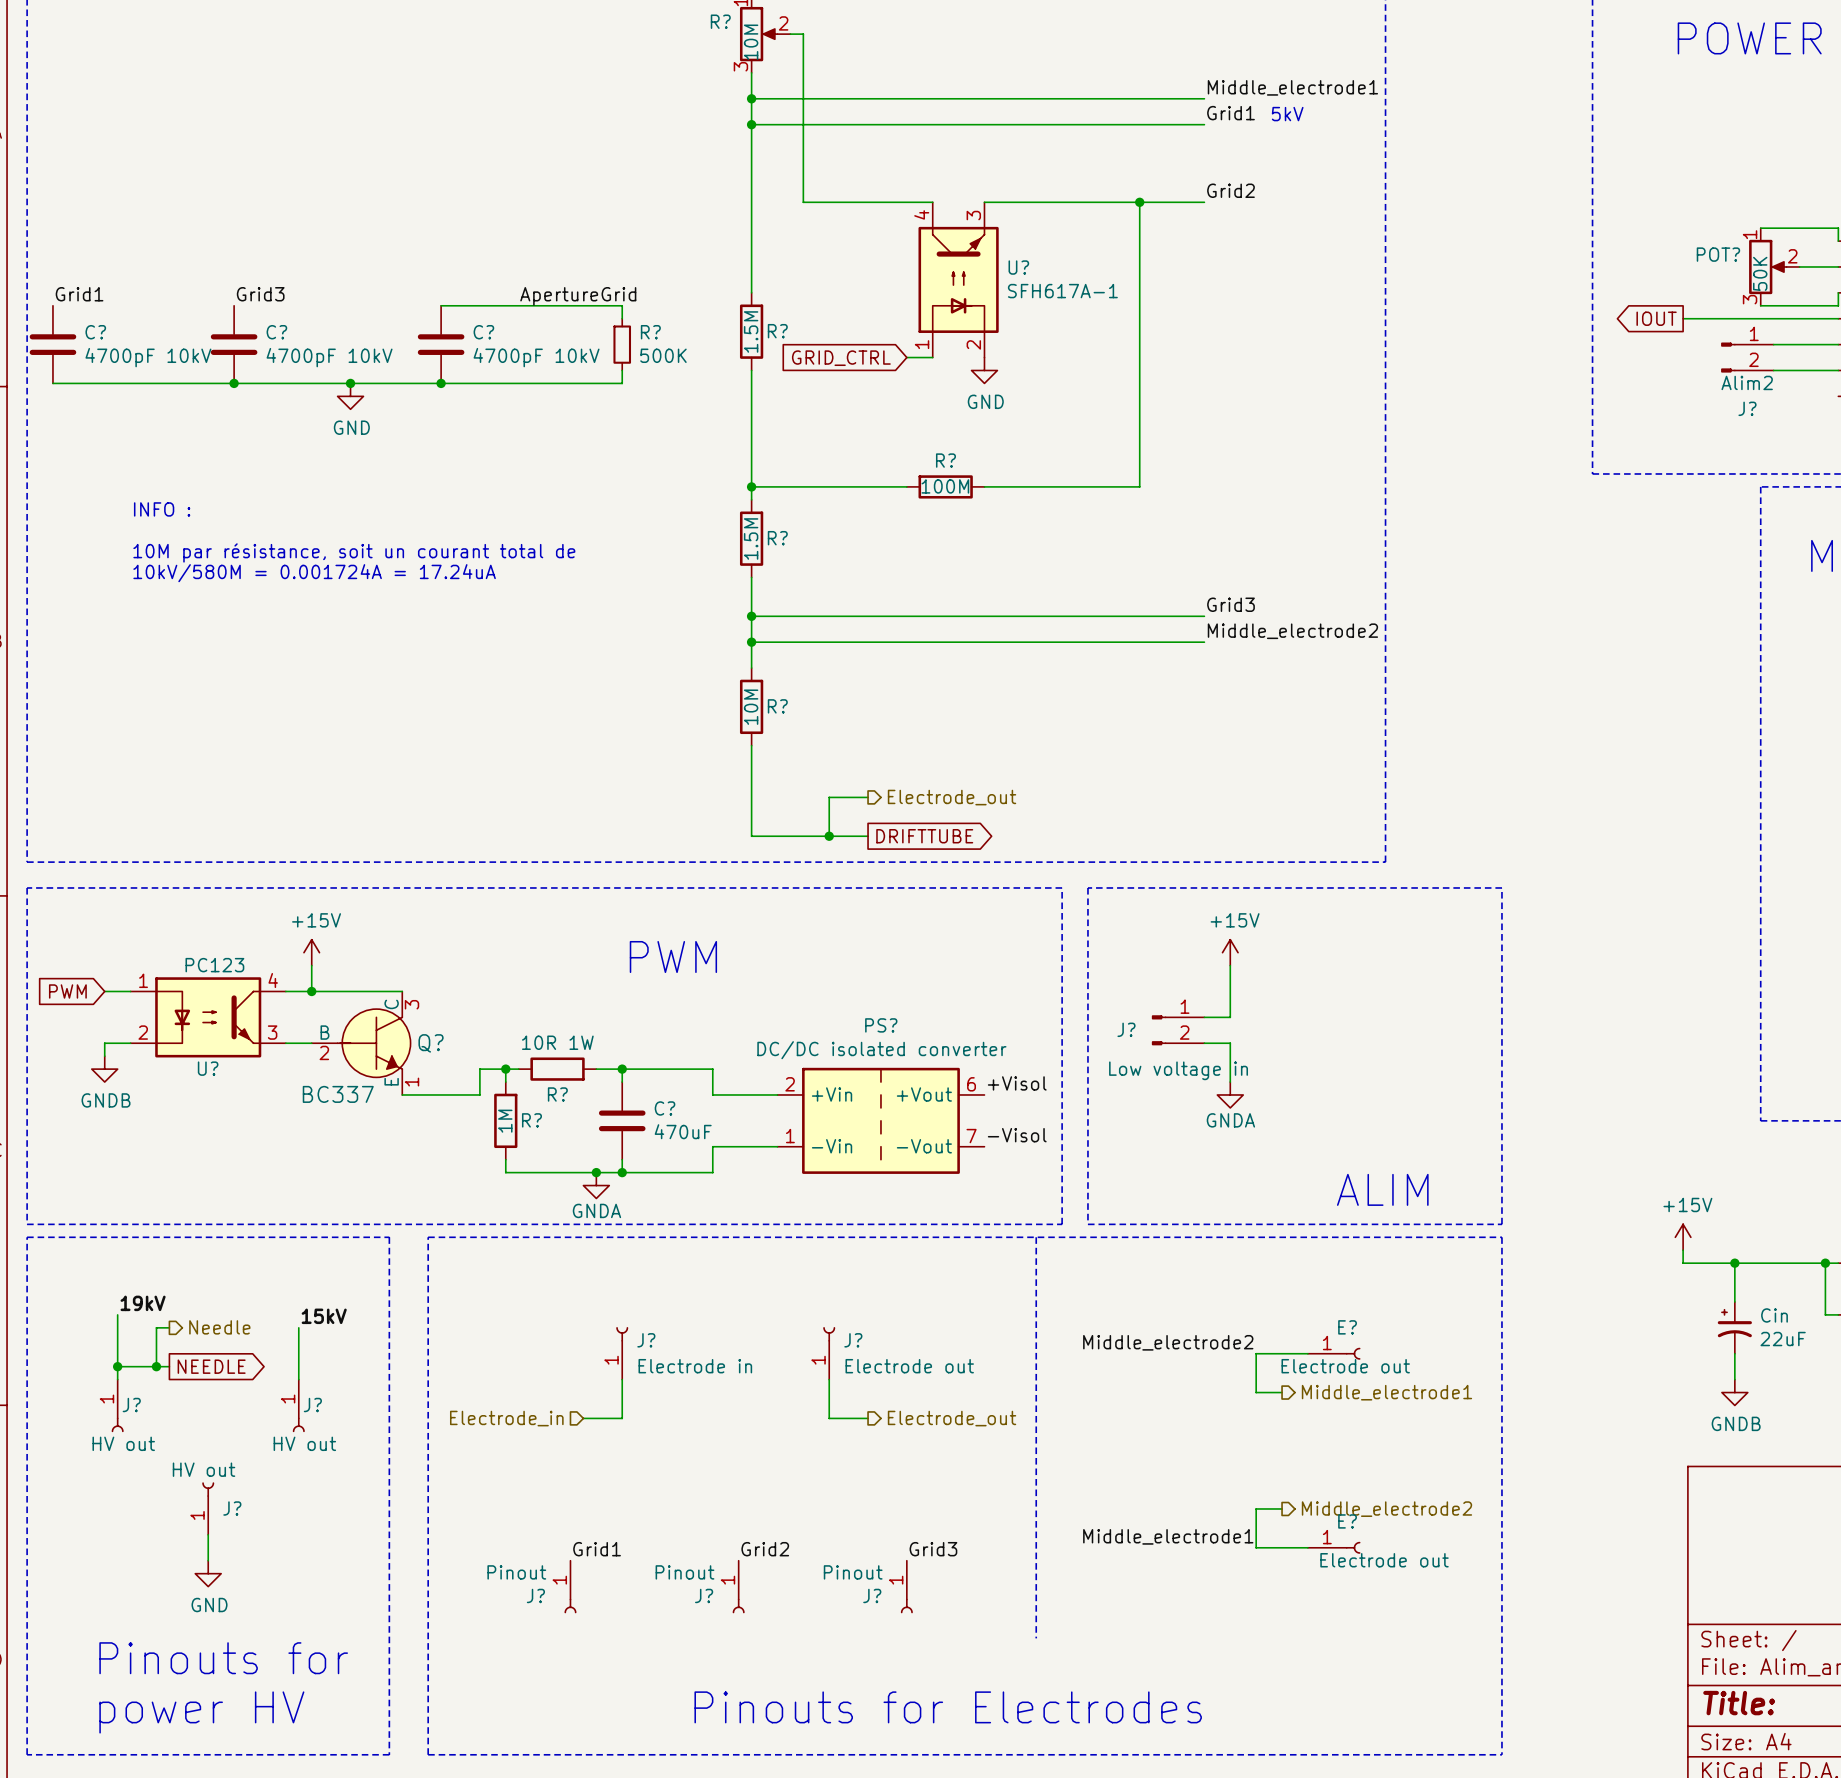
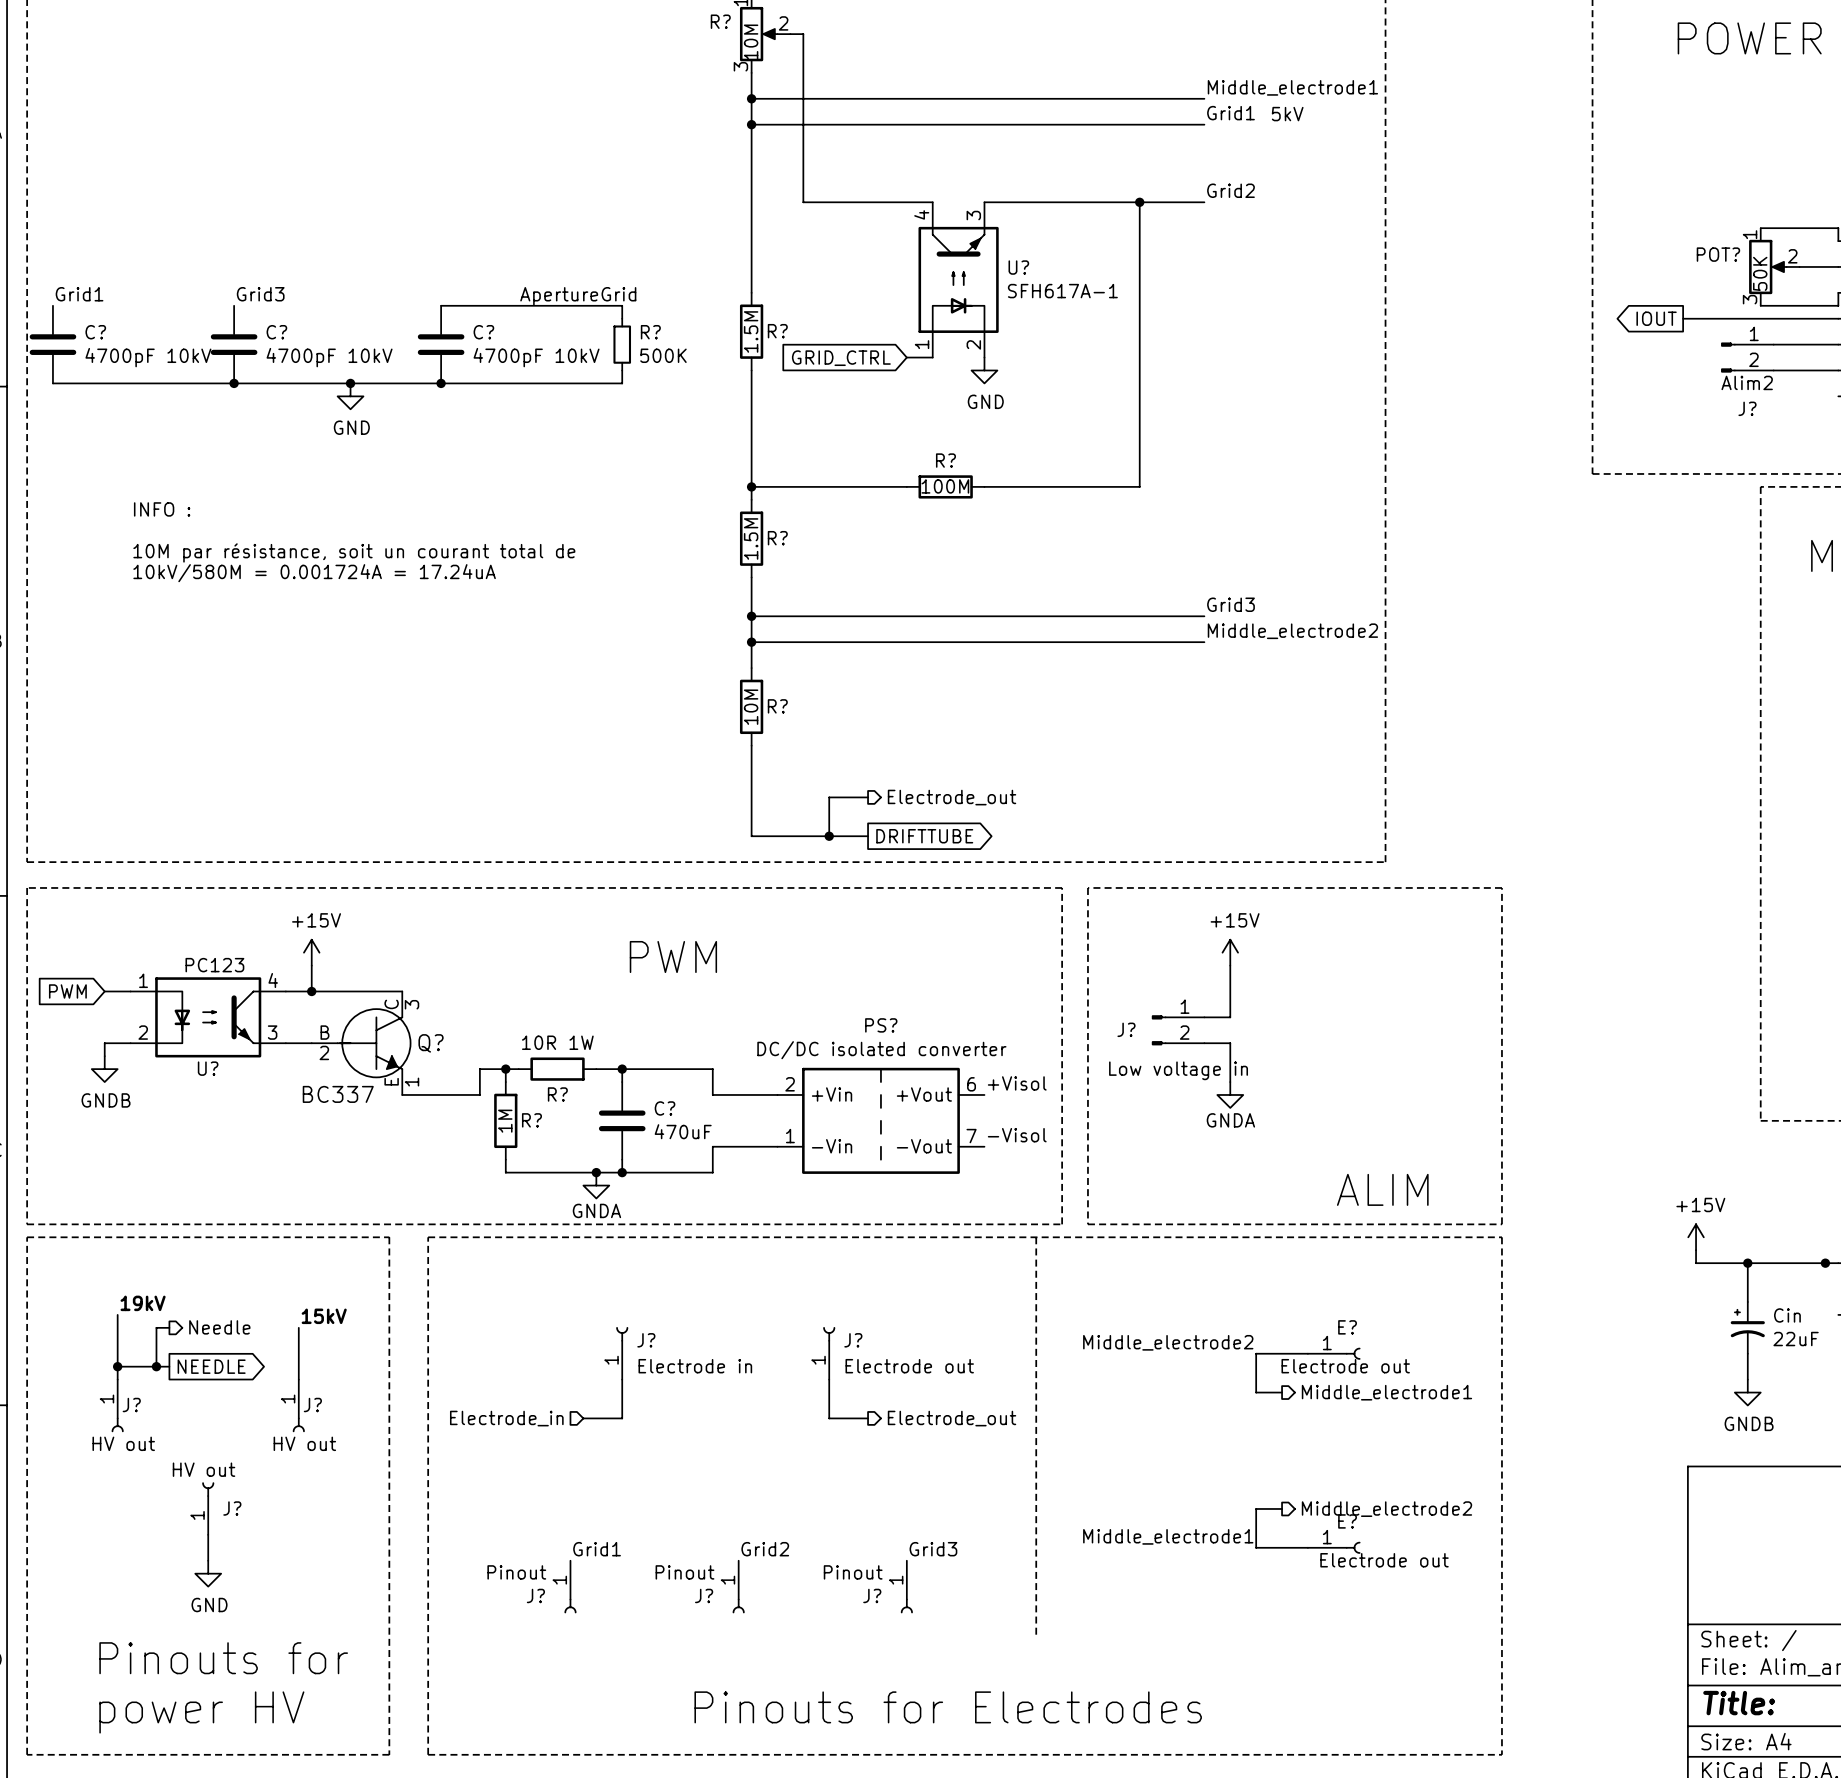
power symbol position: +15V (1683, 1237) -> +15V (1696, 1237)
wire: (1683, 1250) (1683, 1263) (1696, 1263) -> (1696, 1250) (1696, 1263)
wire: (1734, 1263) (1734, 1301) -> (1747, 1263) (1747, 1301)
junction position: (1734, 1263) -> (1747, 1263)
wire: (1825, 1263) (1825, 1314) (1838, 1314) -> none
Cin position: (1734, 1327) -> (1747, 1327)
wire: (1734, 1353) (1734, 1379) -> (1747, 1353) (1747, 1379)
power symbol position: GNDB (1734, 1392) -> GNDB (1747, 1392)

